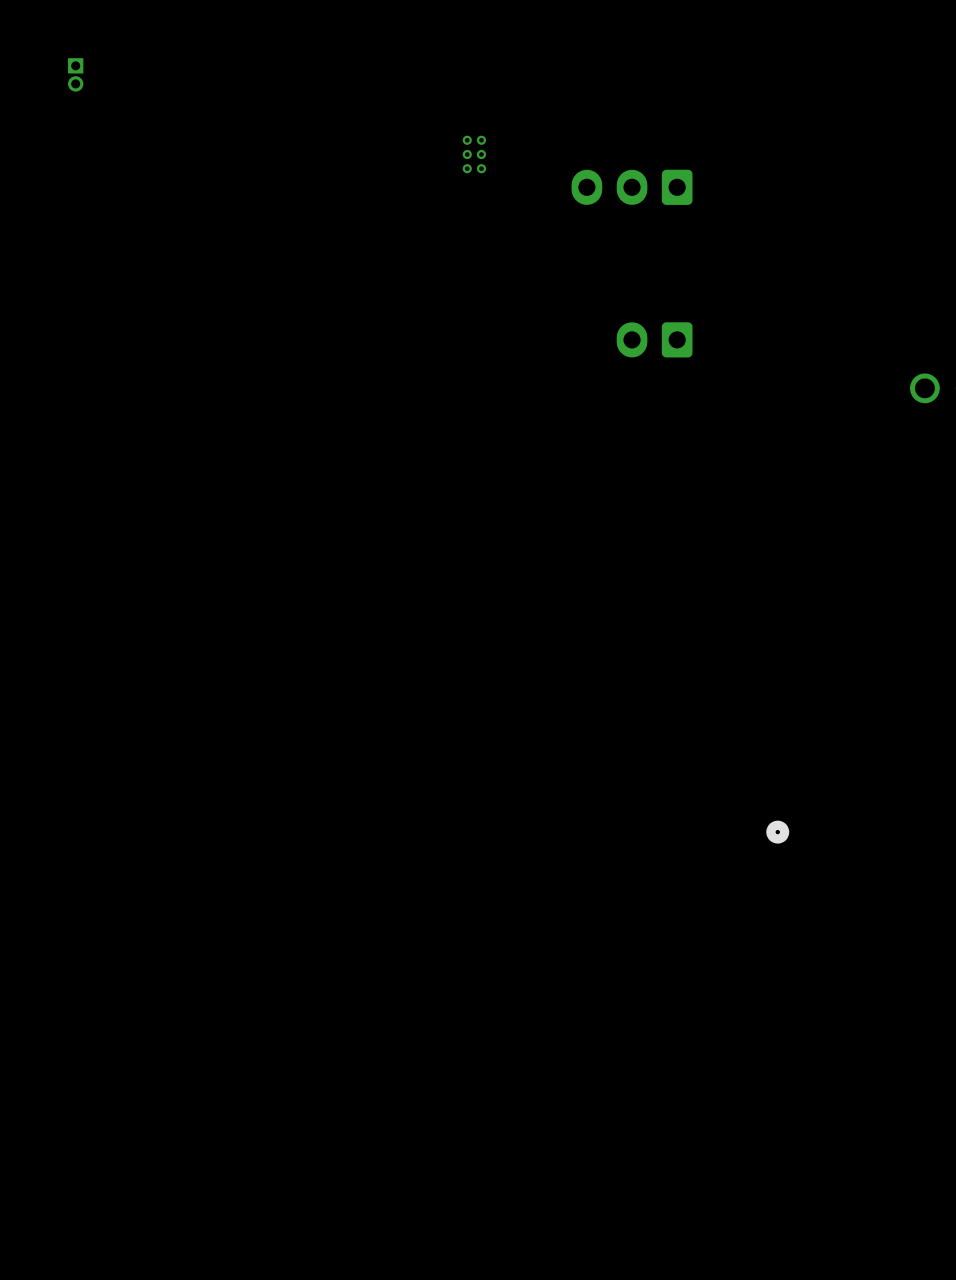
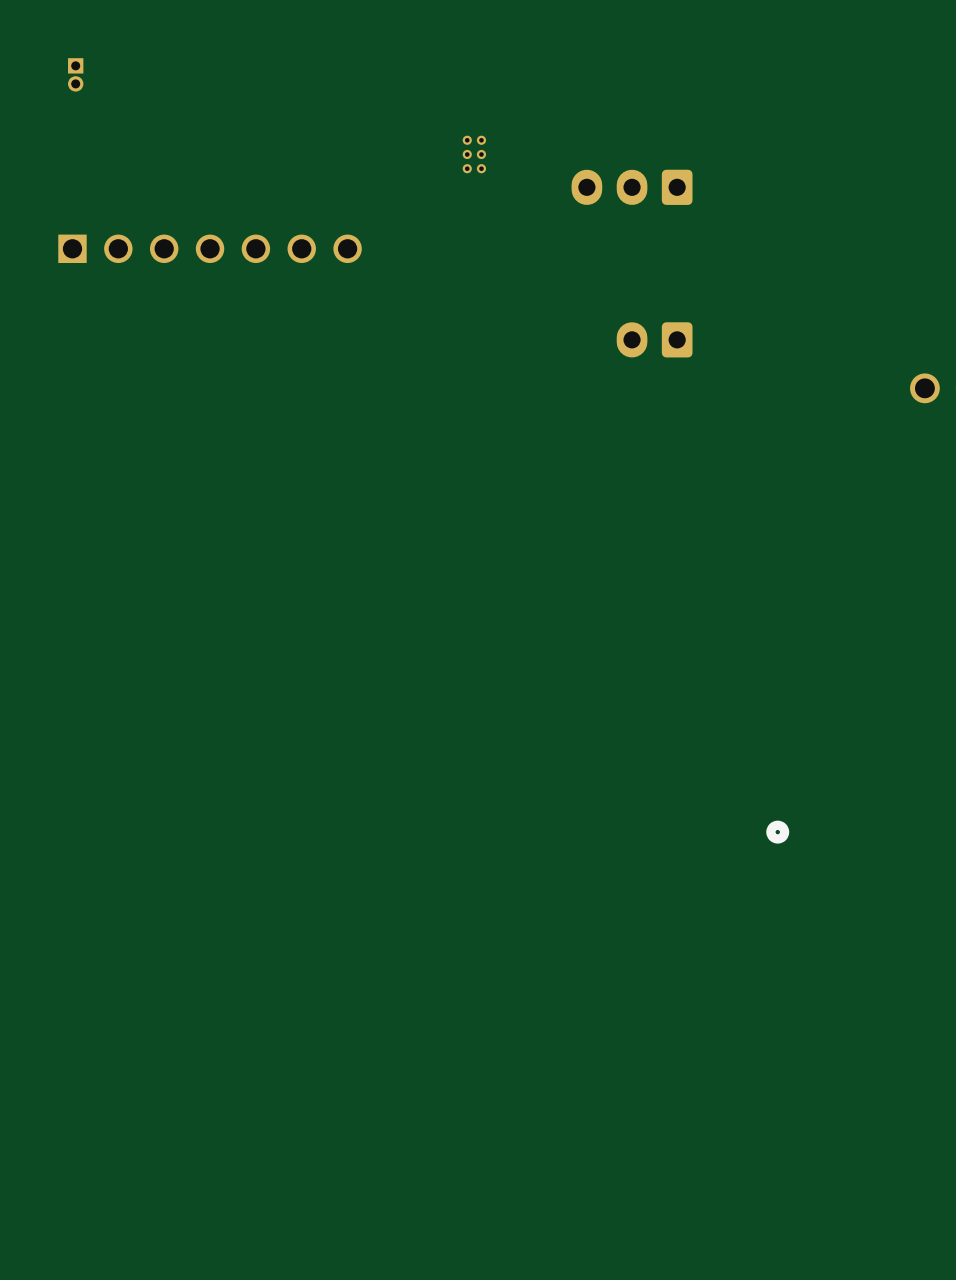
part: none -> (210, 248)

